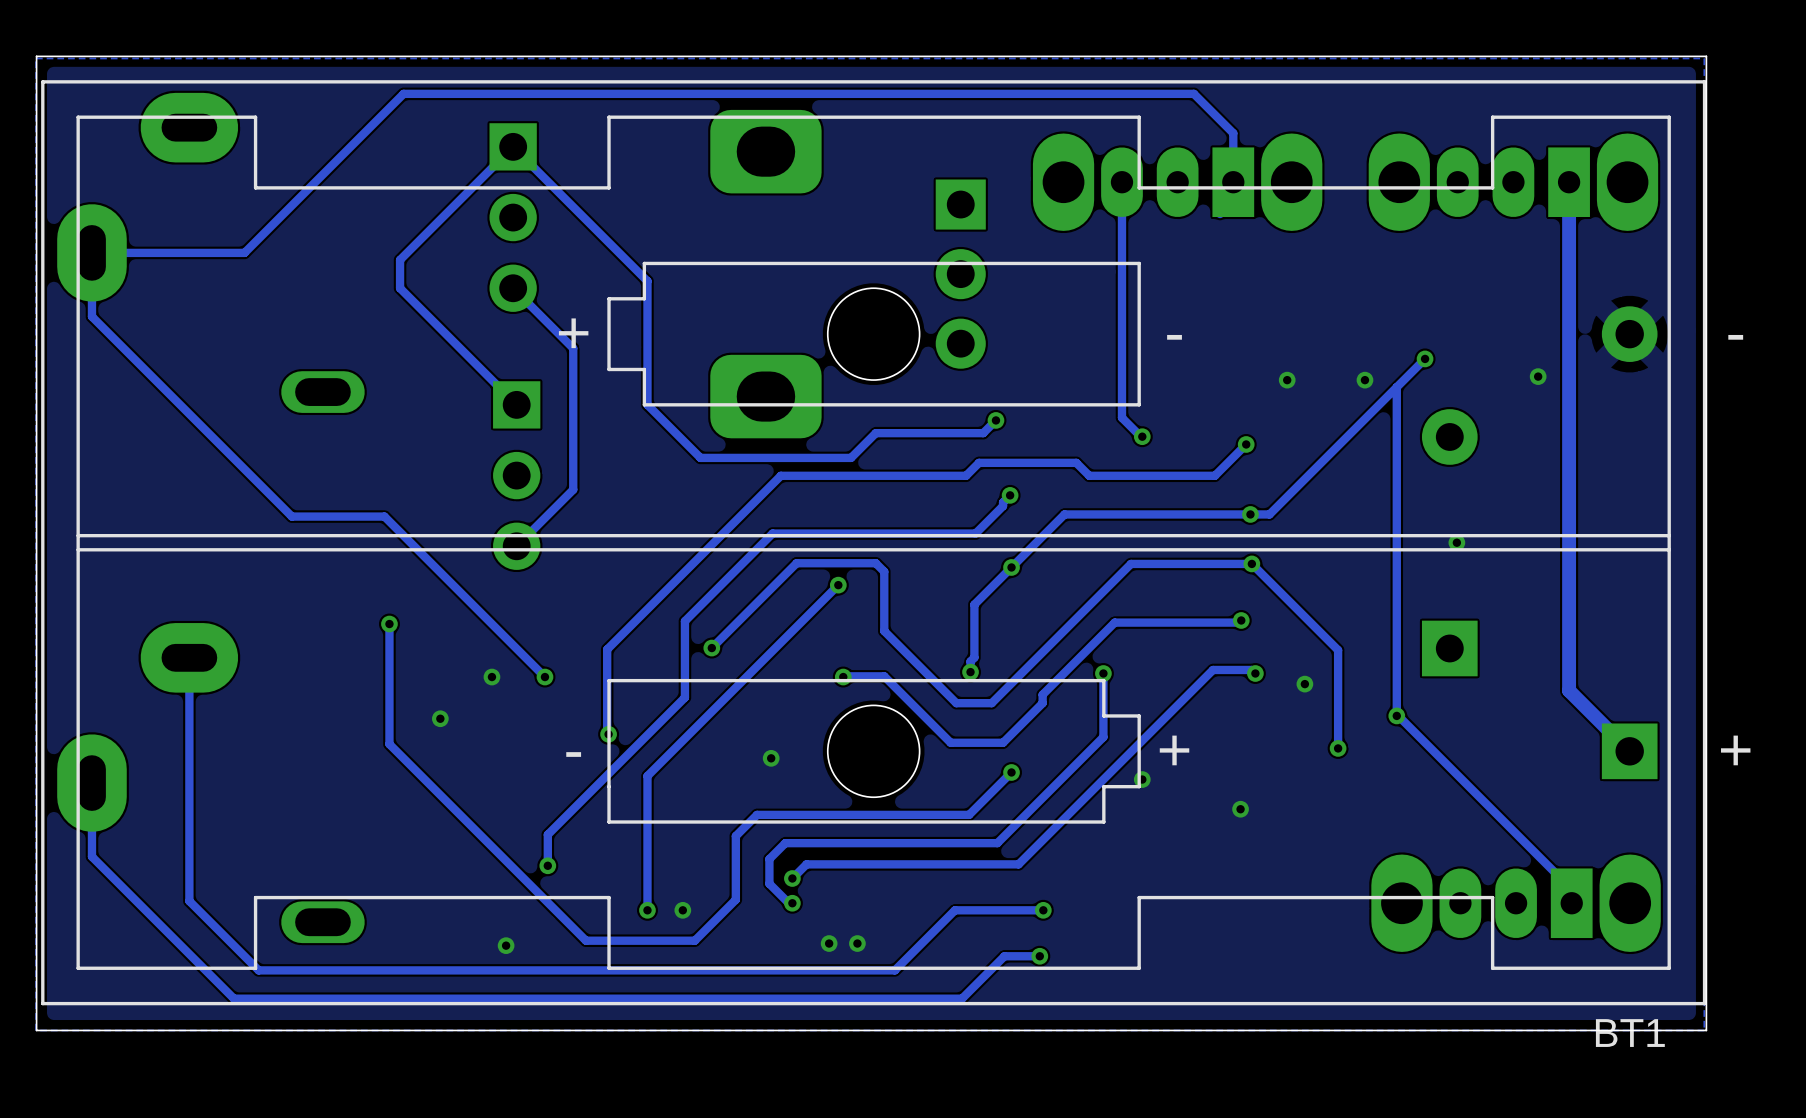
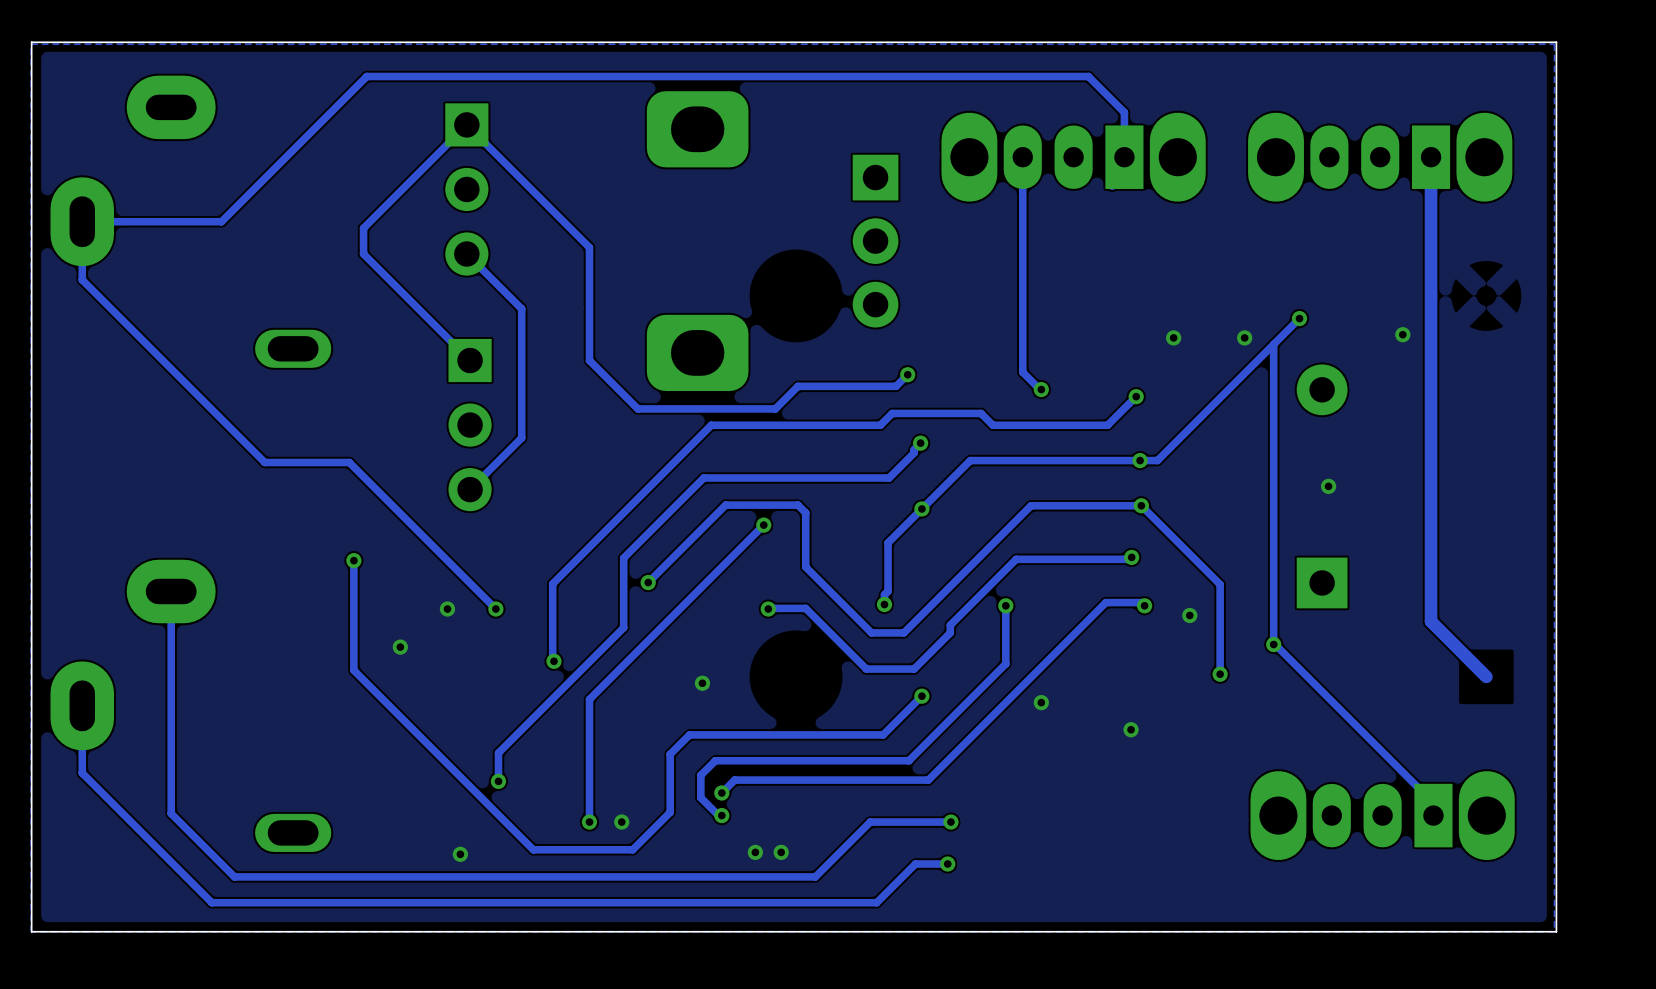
BT1: (873, 542) -> none

